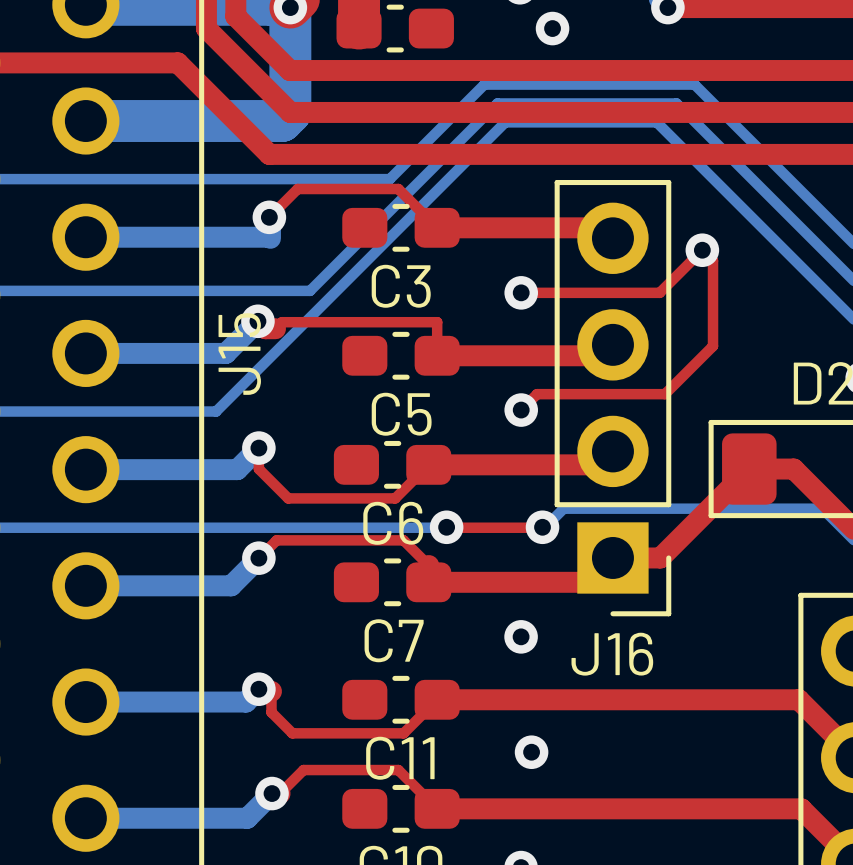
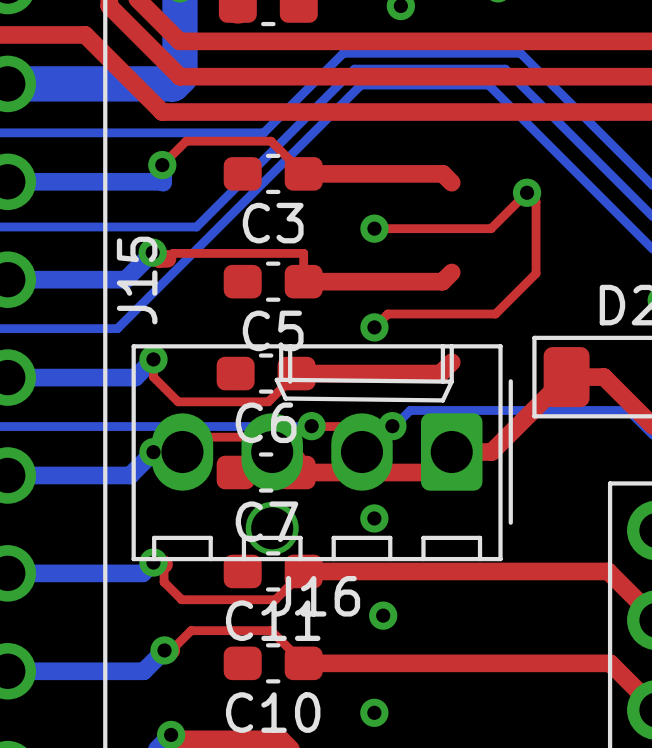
J16 footprint: [554, 179, 672, 617] -> [131, 342, 513, 562]
J16 name position: J16 (612, 654) -> J16 (316, 596)

